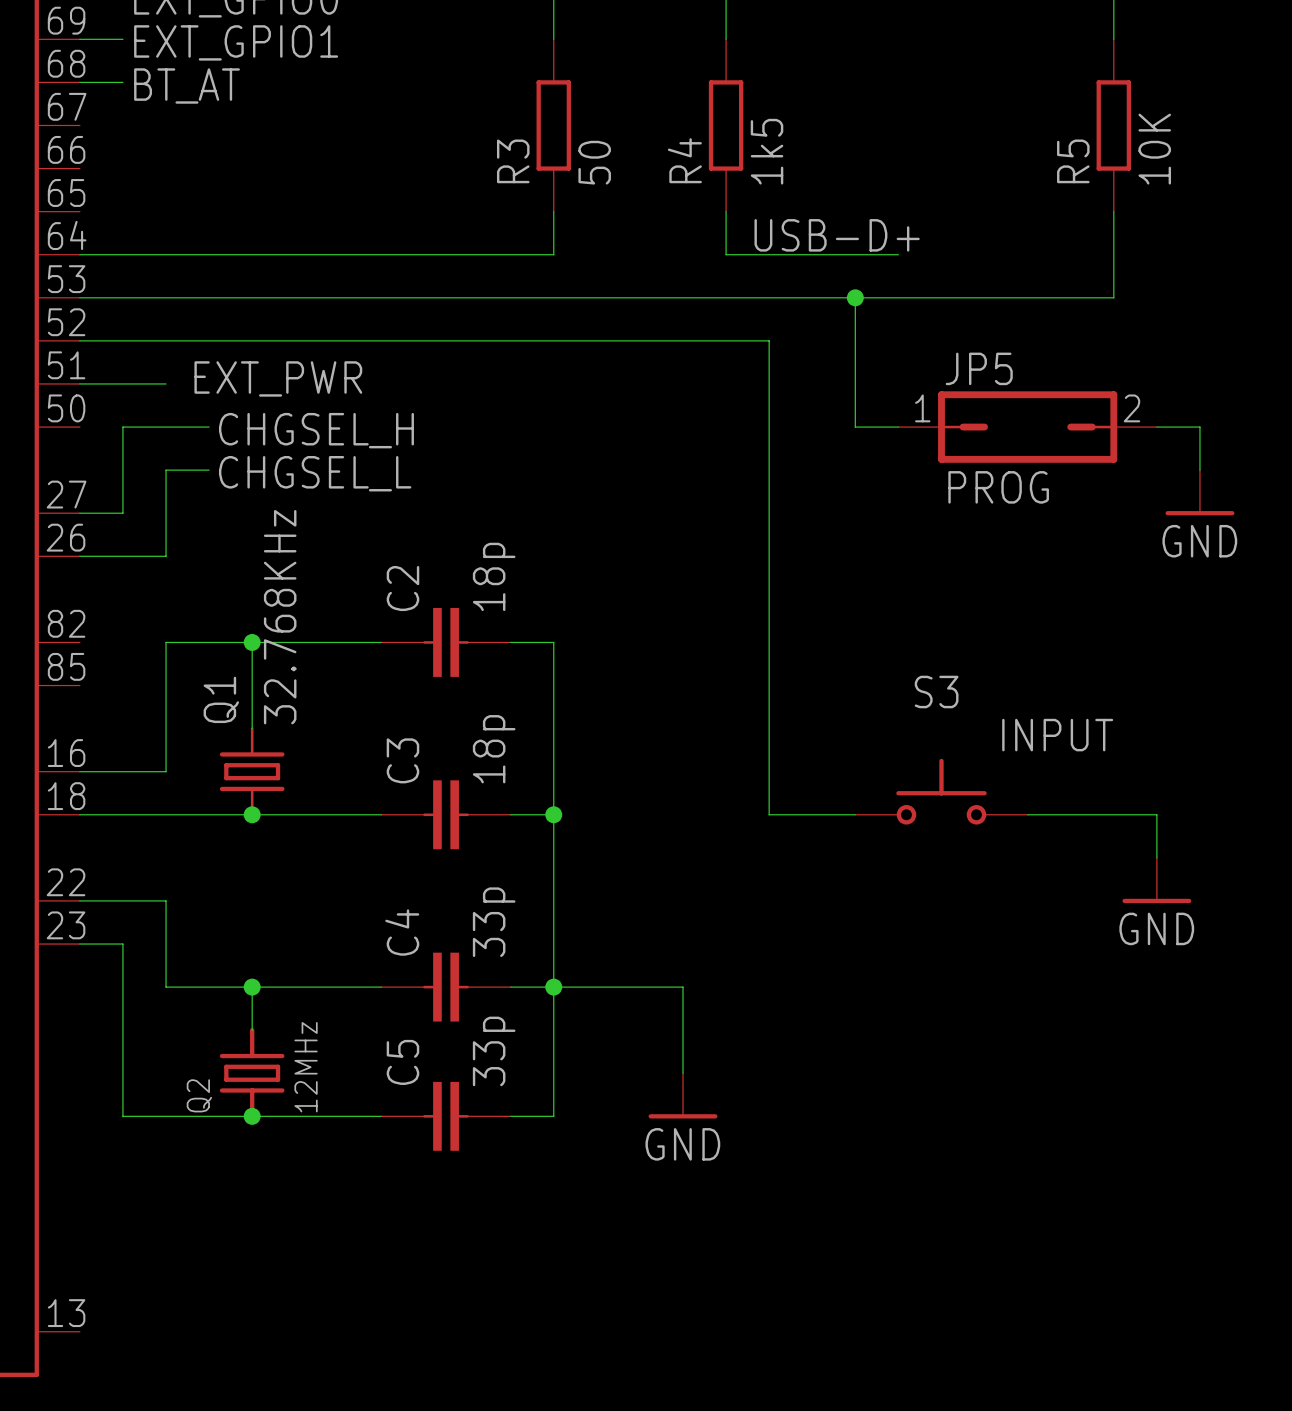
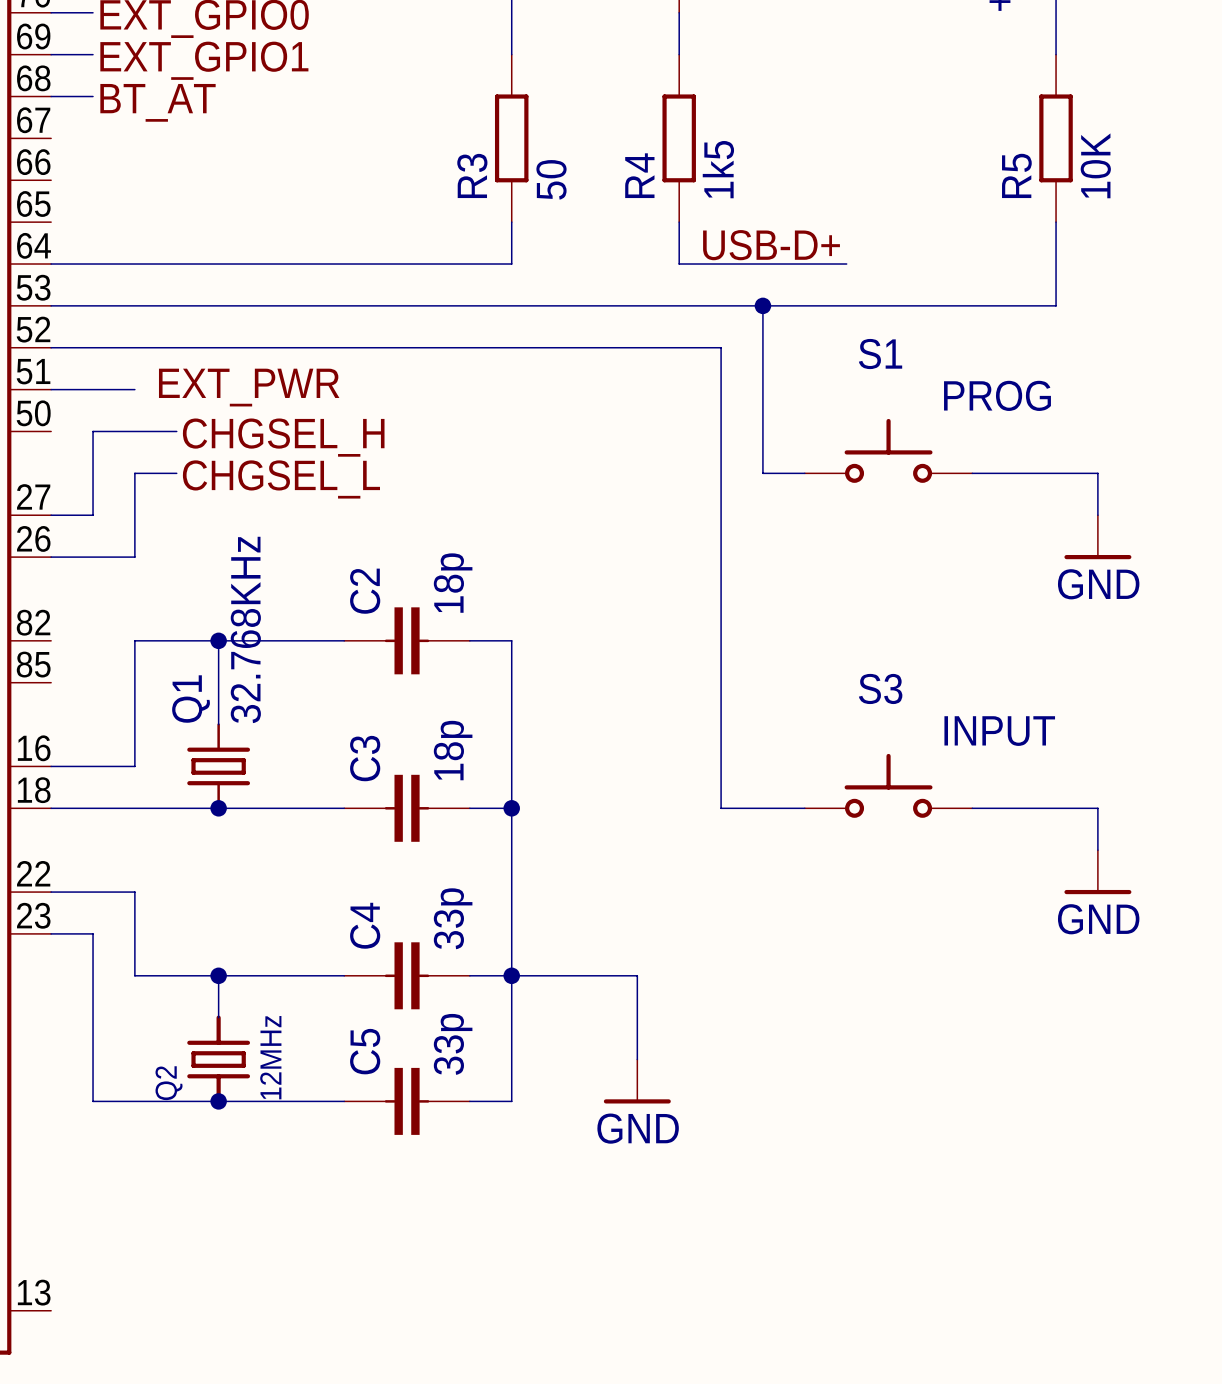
wire: none -> (762, 305) (762, 473) (804, 473)
wire: (855, 297) (855, 427) (898, 427) -> none
junction position: (855, 297) -> (762, 305)
JP5: PROG (1027, 427) -> none
wire: (1156, 427) (1199, 427) (1199, 470) -> none
S1: none -> PROG (888, 450)
wire: none -> (972, 473) (1097, 473) (1097, 515)
power symbol position: GND (1199, 492) -> GND (1097, 537)

